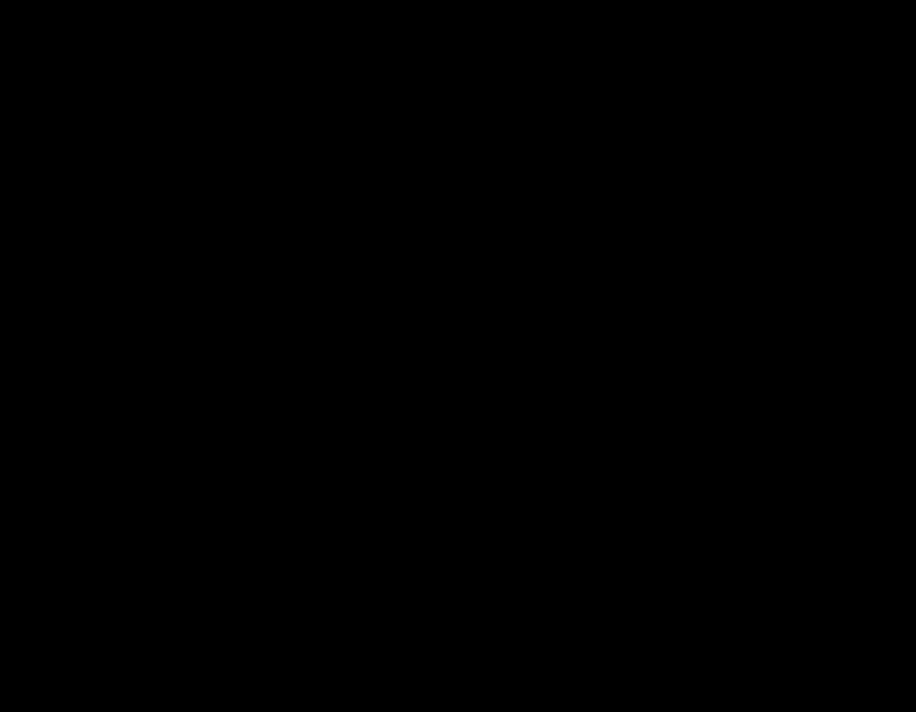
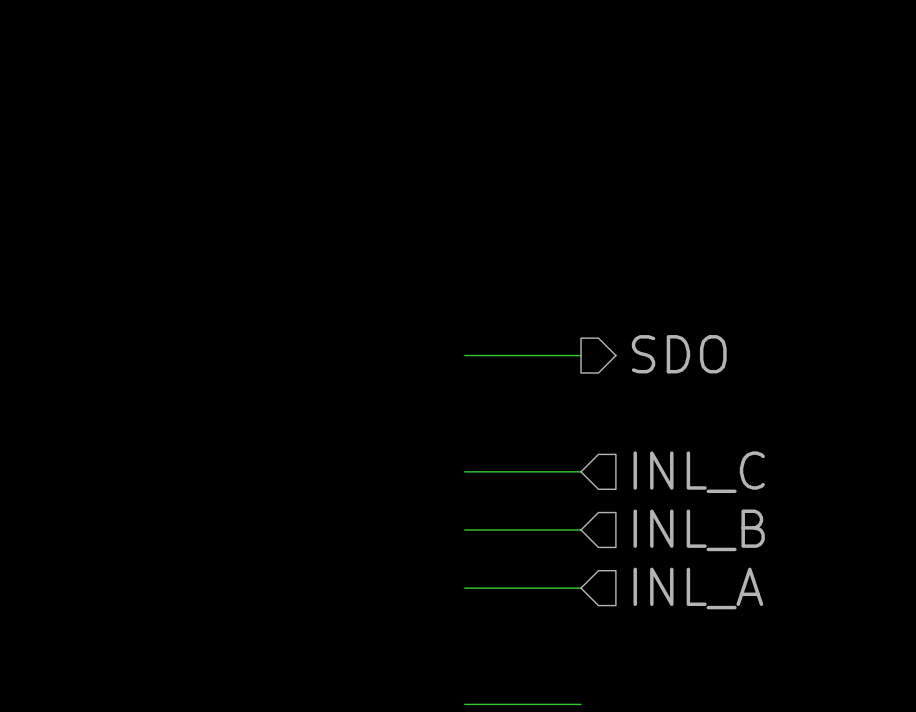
hierarchical label: none -> SDO (679, 354)
wire: none -> (464, 355) (581, 355)
wire: none -> (464, 471) (581, 471)
hierarchical label: none -> INL_C (699, 472)
wire: none -> (464, 529) (581, 529)
hierarchical label: none -> INL_B (699, 530)
wire: none -> (464, 588) (581, 588)
hierarchical label: none -> INL_A (698, 588)
wire: none -> (464, 704) (581, 704)

